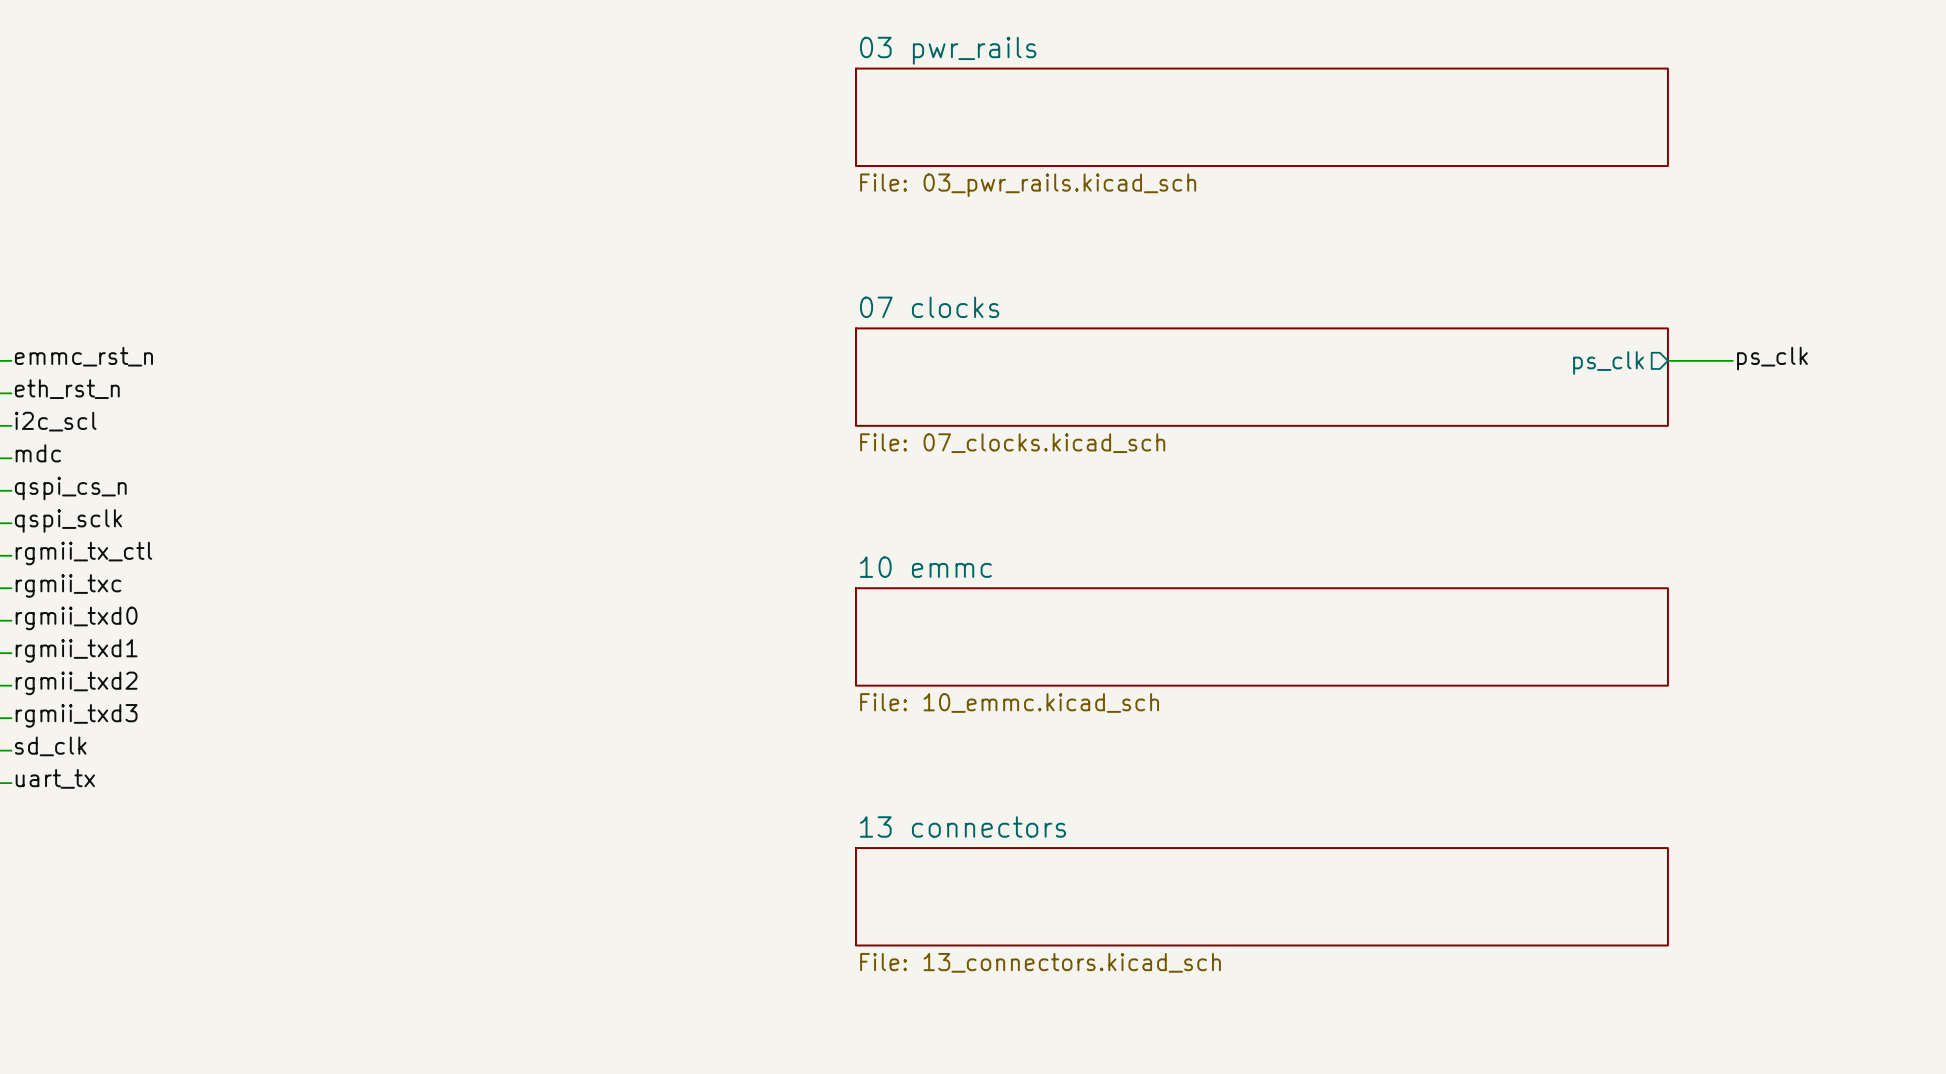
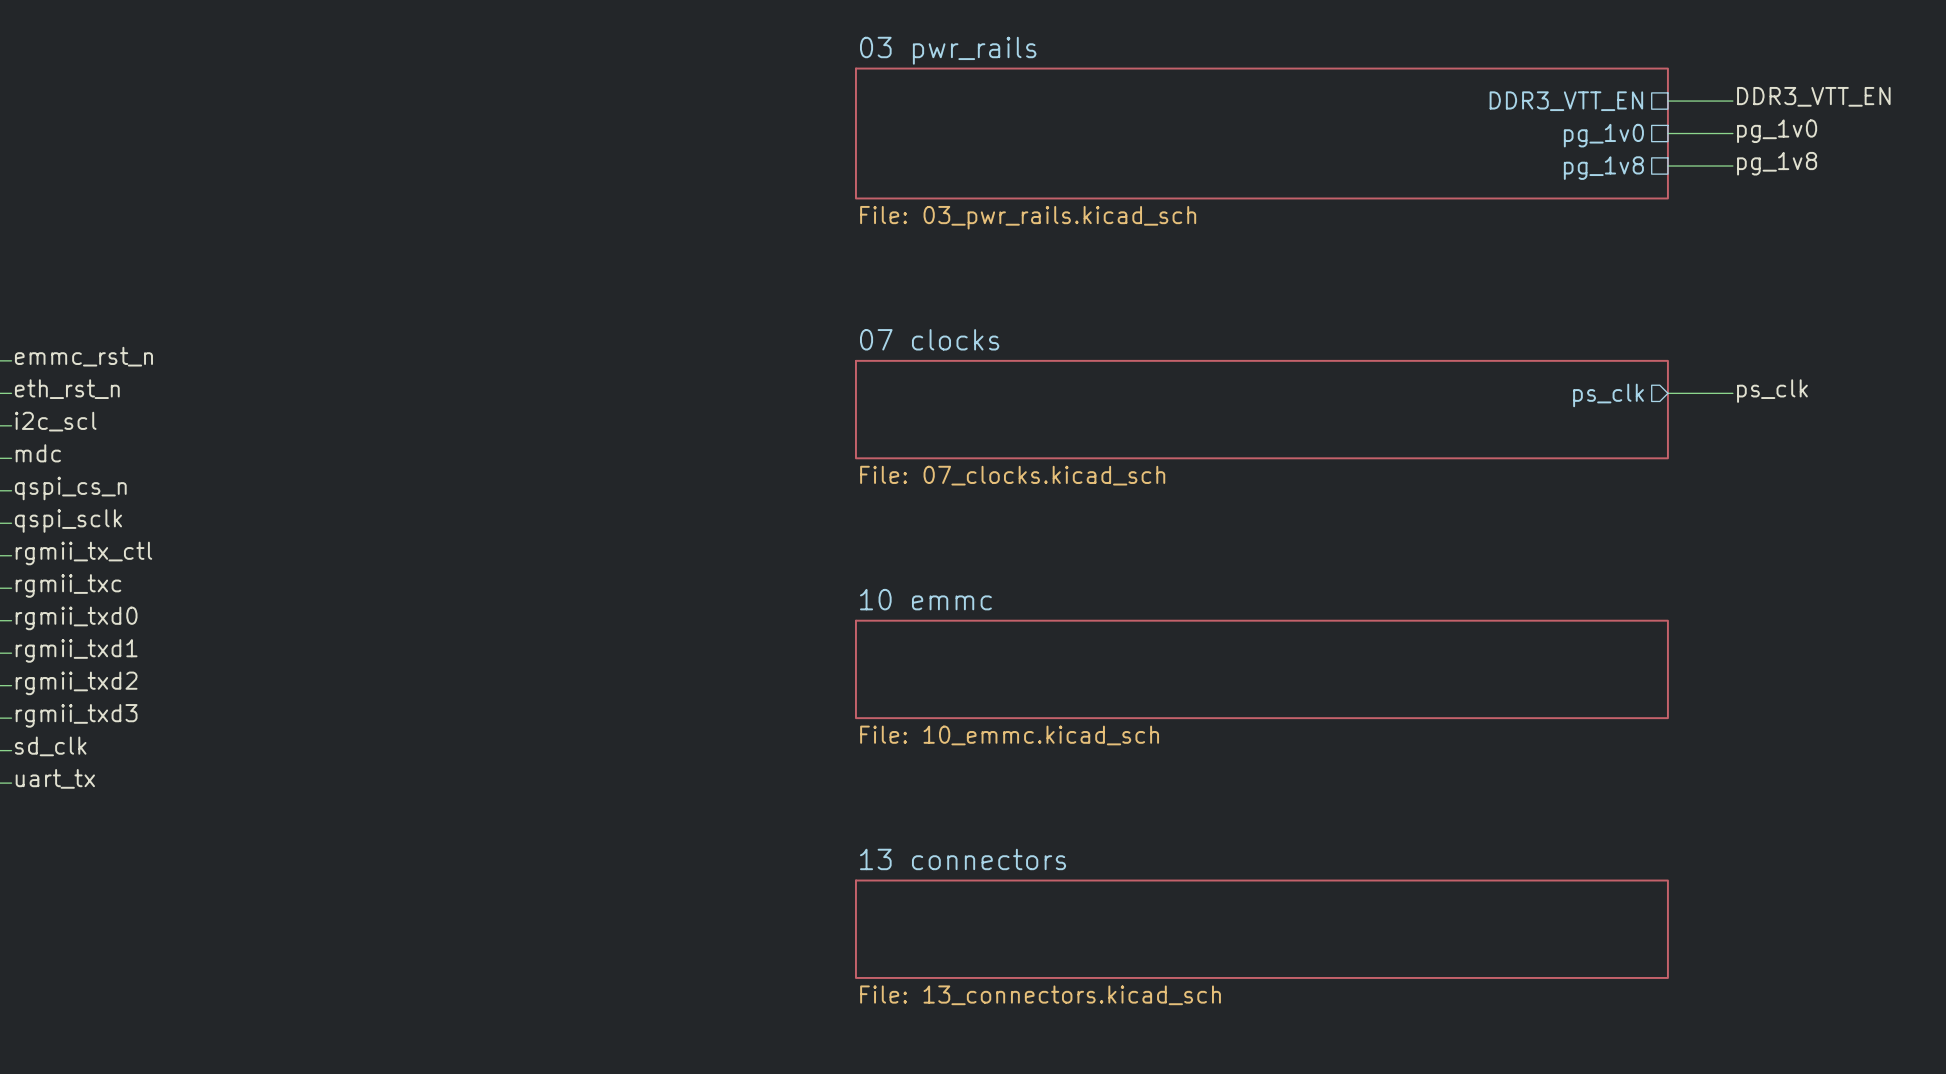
sheet 03 pwr_rails shape: [854, 67, 1669, 167] -> [854, 67, 1669, 200]
label: none -> DDR3_VTT_EN (1813, 96)
sheet pin: none -> DDR3_VTT_EN (1566, 101)
wire: none -> (1667, 101) (1732, 101)
label: none -> pg_1v0 (1777, 131)
wire: none -> (1667, 133) (1732, 133)
sheet pin: none -> pg_1v0 (1603, 135)
label: none -> pg_1v8 (1777, 163)
wire: none -> (1667, 166) (1732, 166)
sheet pin: none -> pg_1v8 (1603, 168)
label position: ps_clk (1772, 358) -> ps_clk (1772, 391)
wire: (1667, 360) (1732, 360) -> (1667, 393) (1732, 393)
sheet pin position: ps_clk (1608, 362) -> ps_clk (1608, 395)
sheet 07 clocks position: (1261, 377) -> (1261, 409)
sheet 10 emmc position: (1261, 636) -> (1261, 669)
sheet 13 connectors position: (1261, 896) -> (1261, 929)

